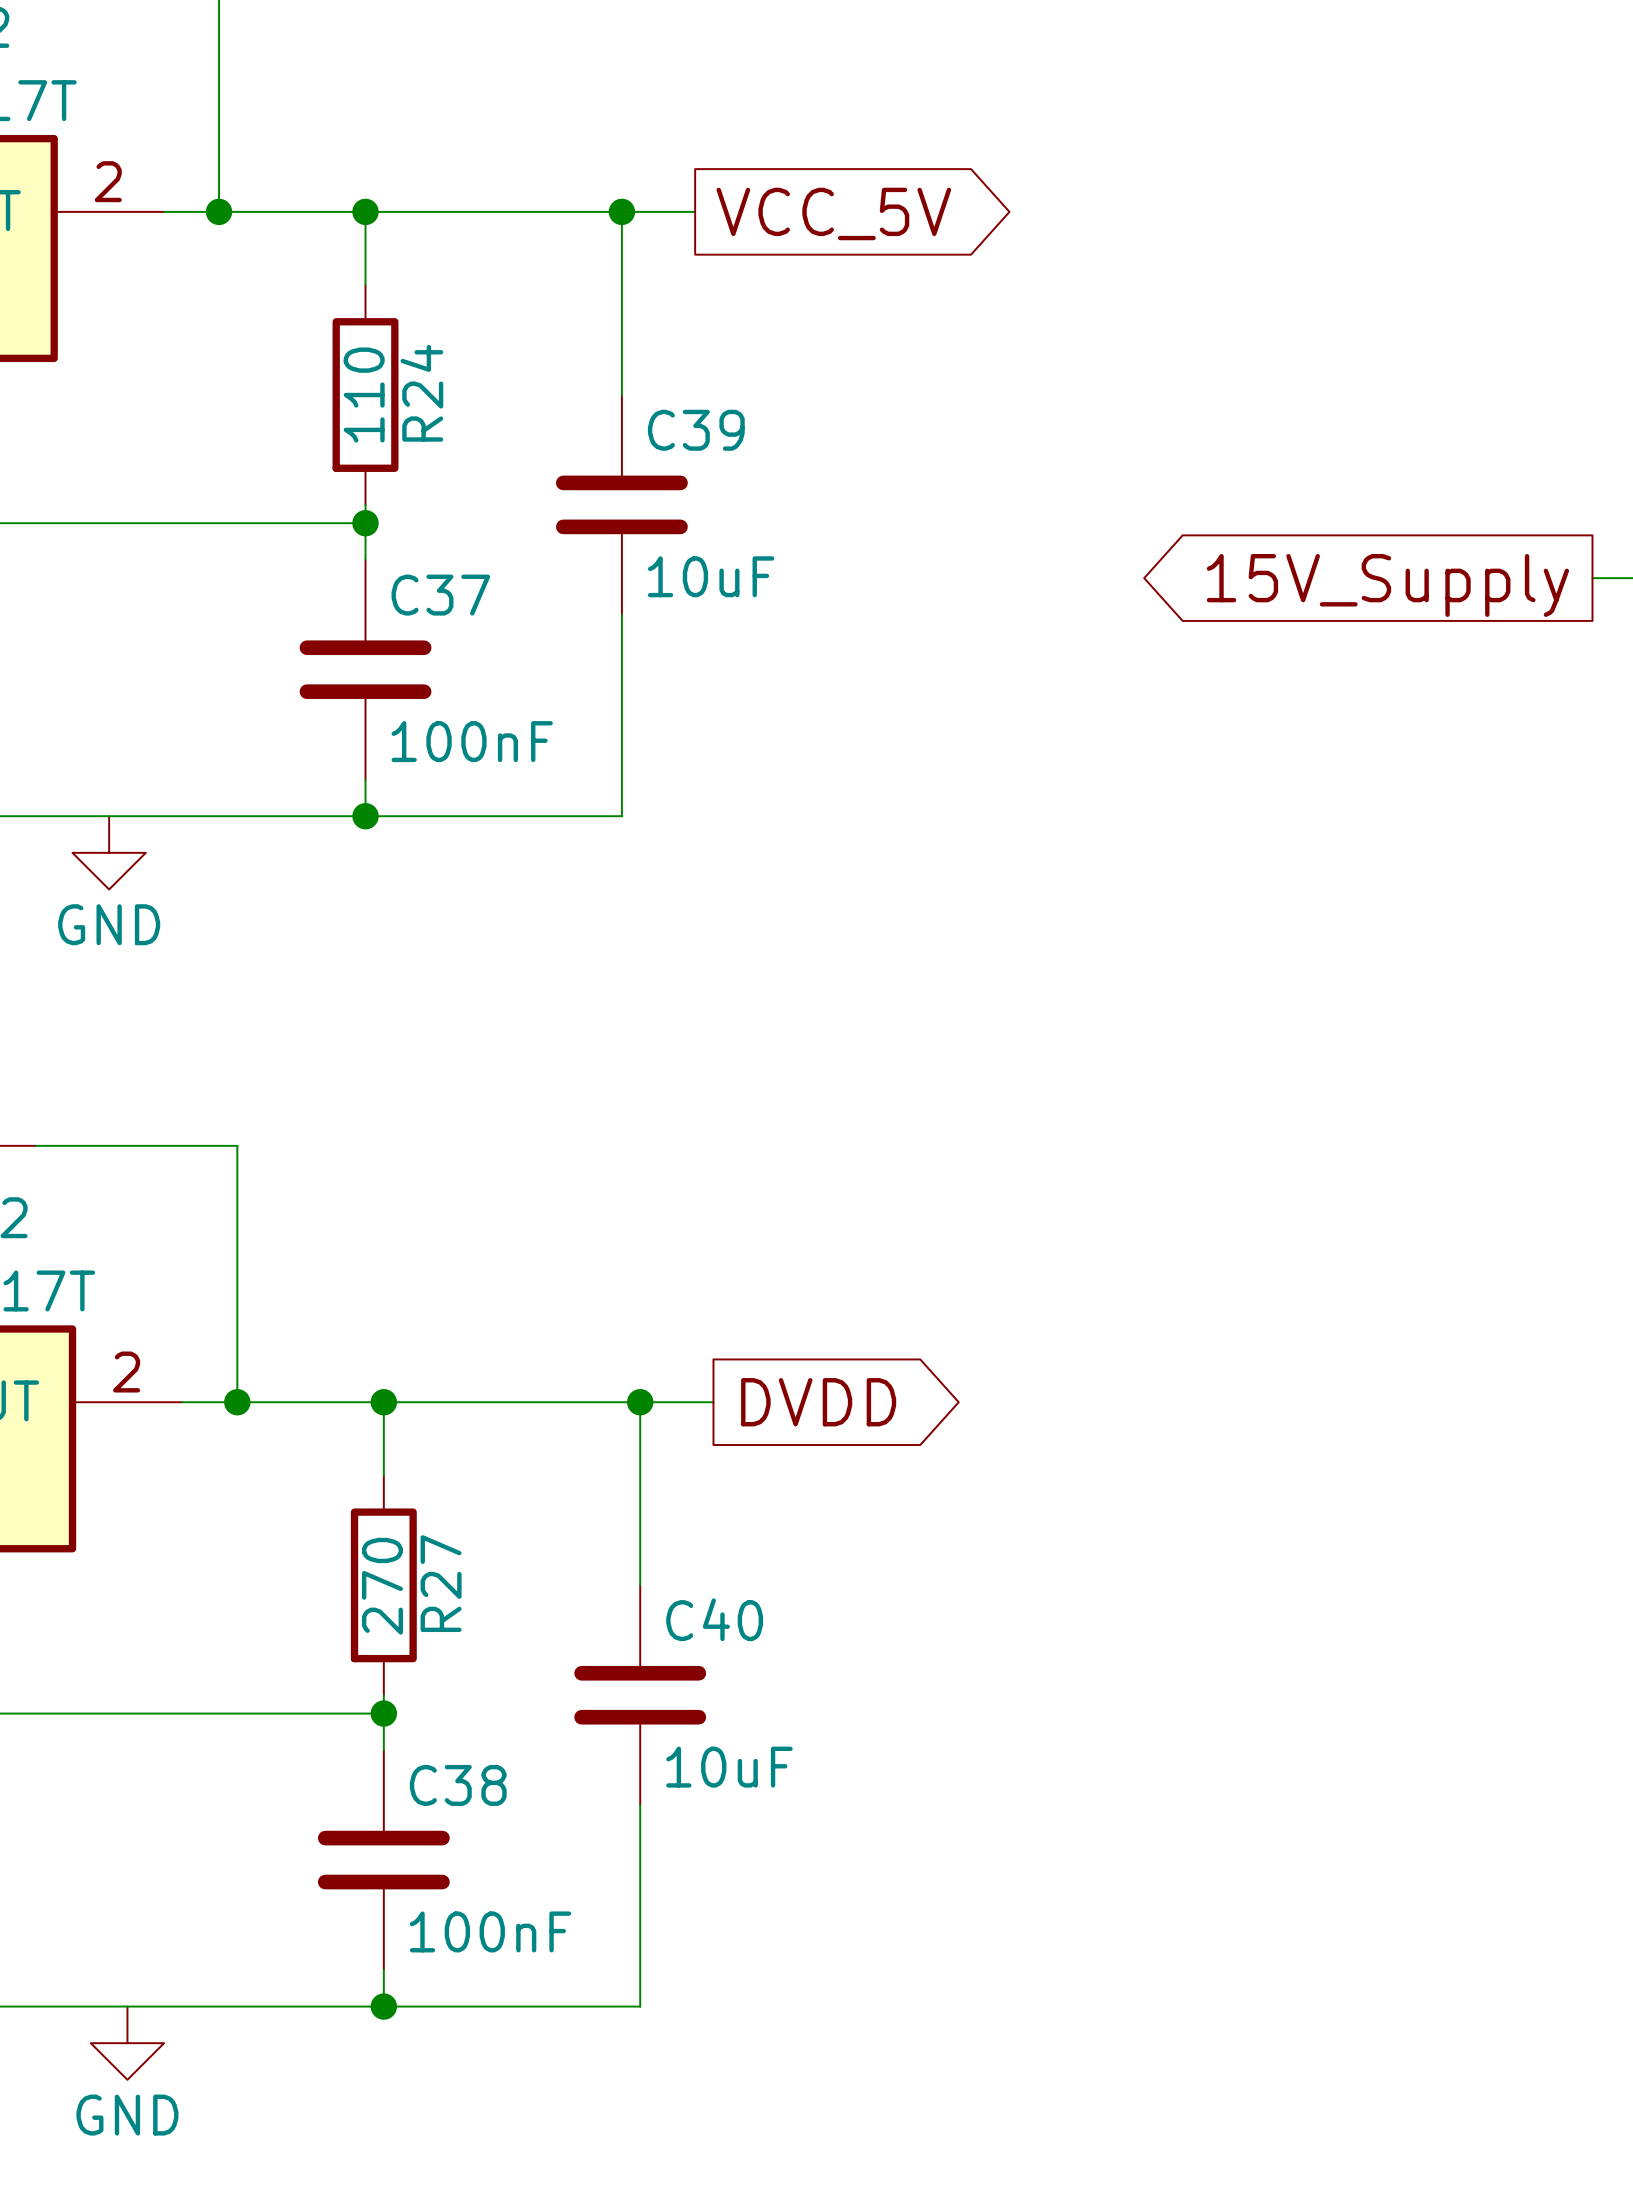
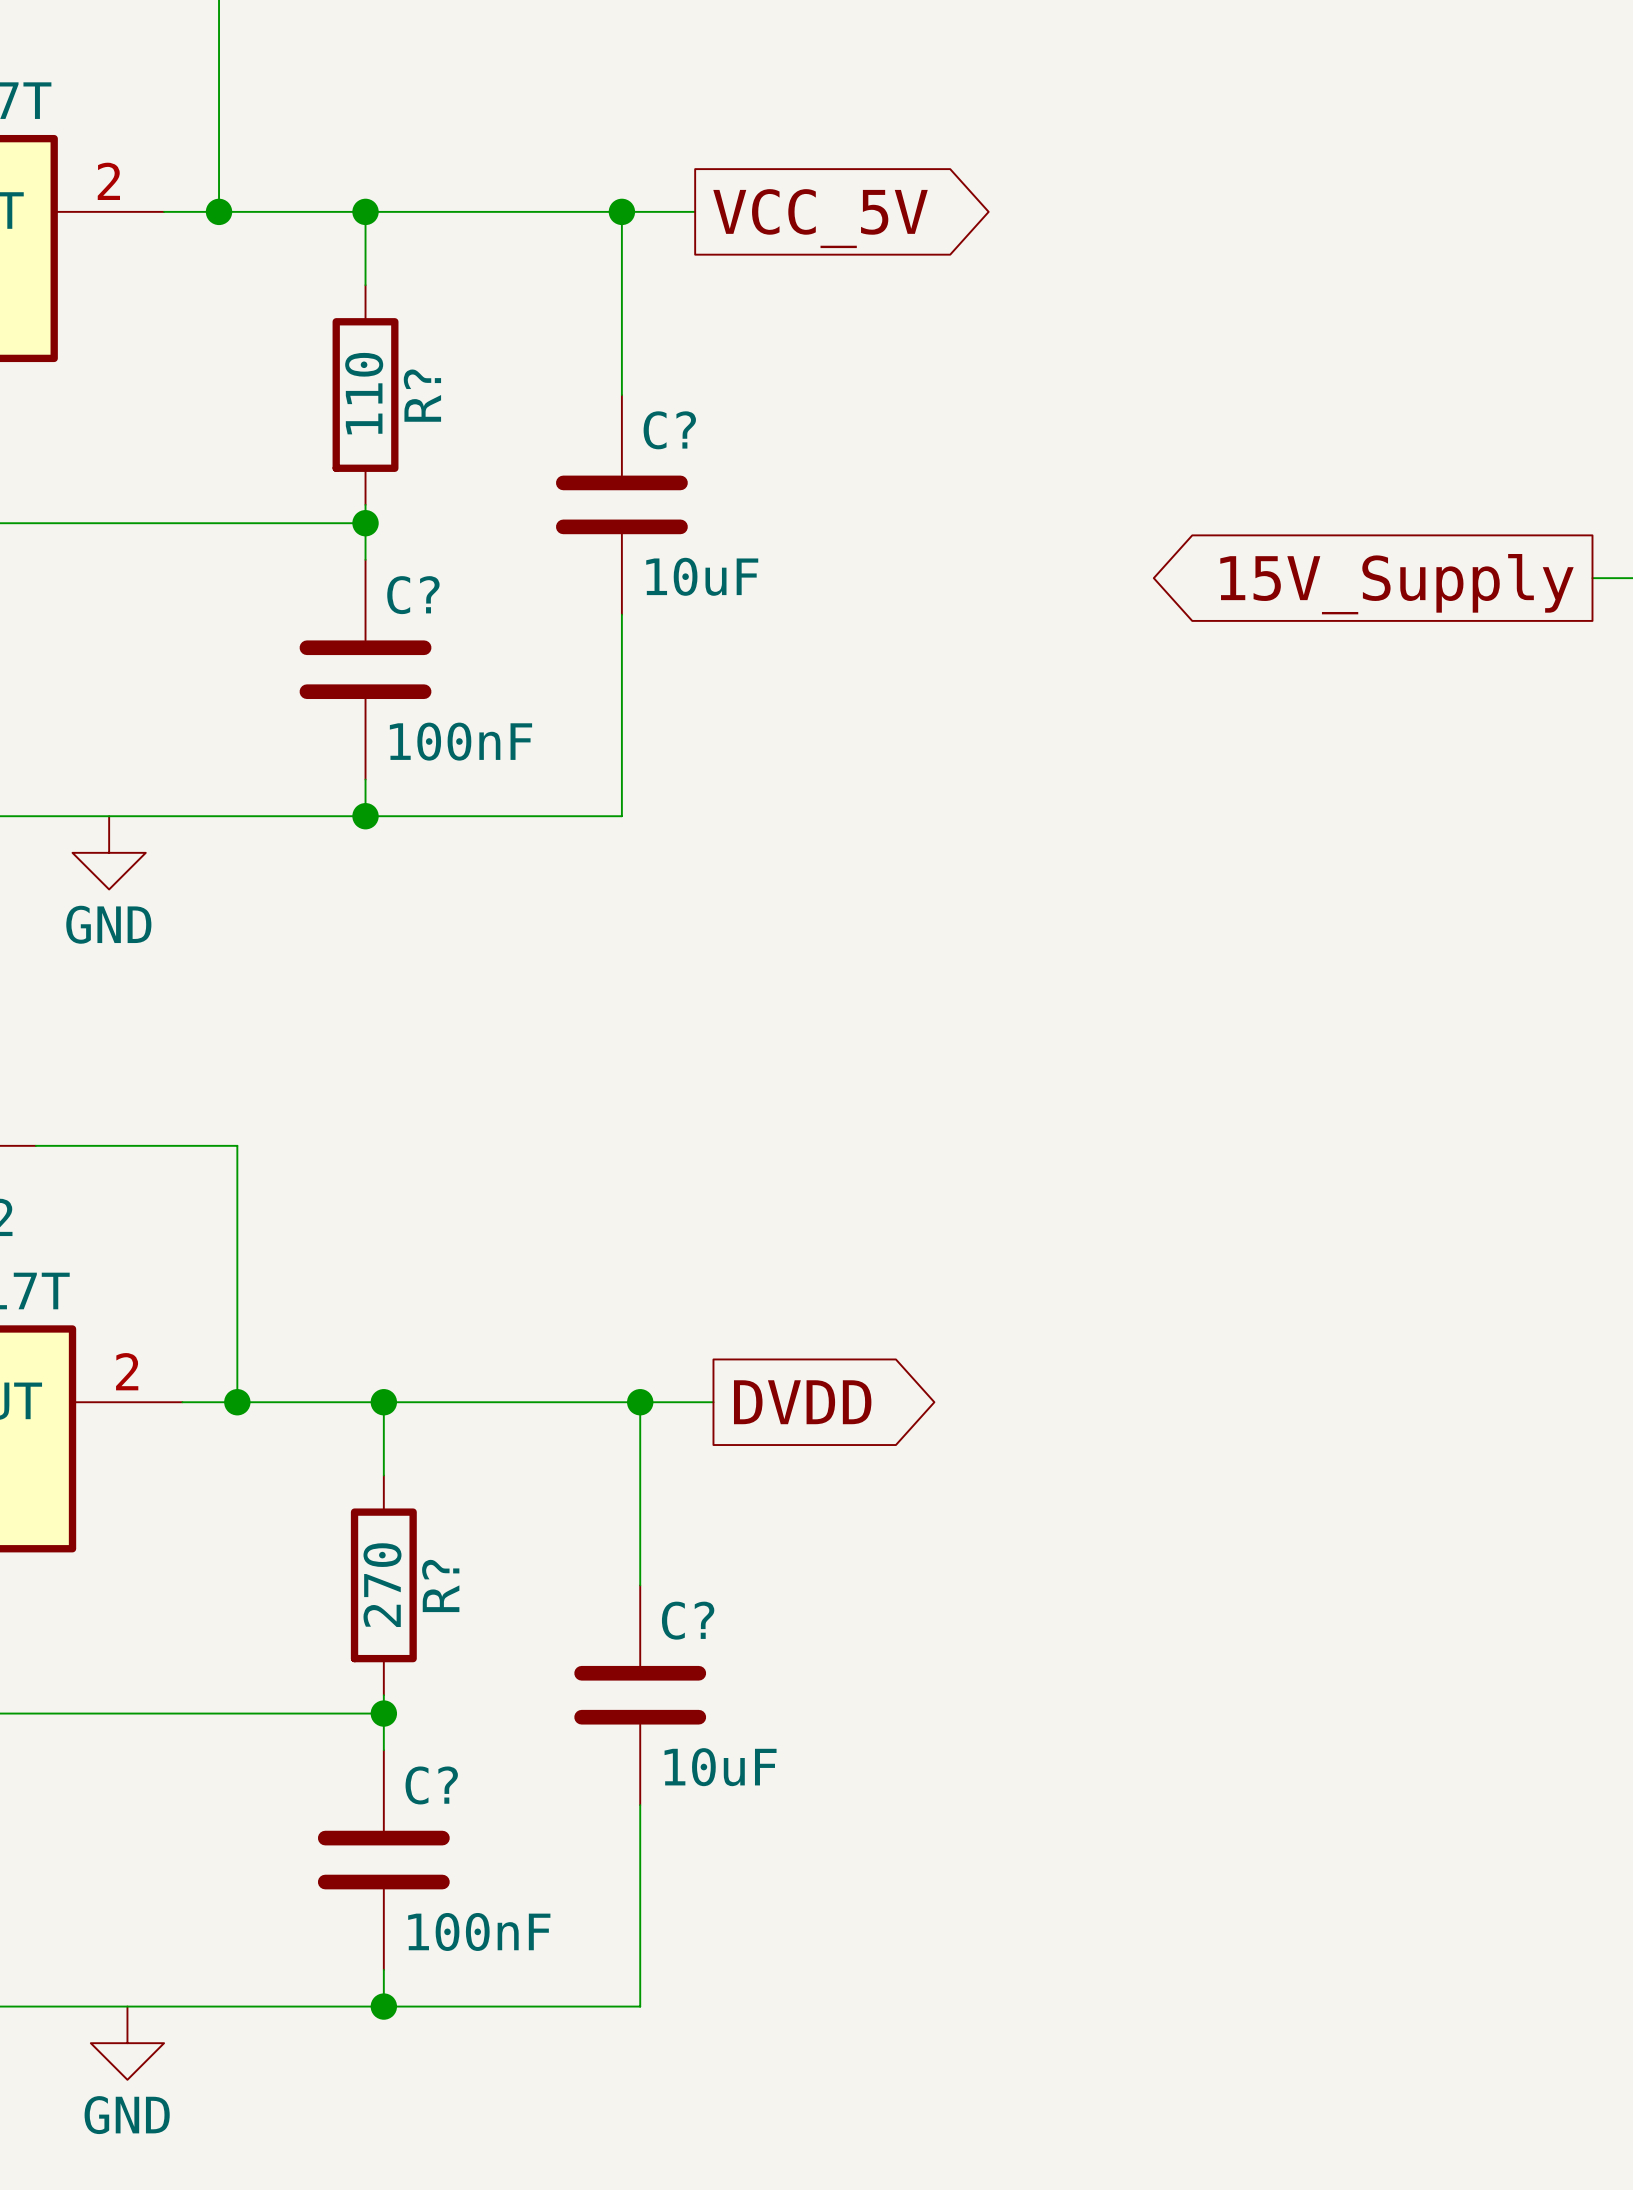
R24 name: R24 (421, 393) -> R? (422, 395)
C39 name: C39 (696, 430) -> C? (669, 430)
C37 name: C37 (440, 595) -> C? (413, 595)
R27 name: R27 (441, 1583) -> R? (440, 1585)
C40 name: C40 (714, 1619) -> C? (688, 1620)
C38 name: C38 (458, 1785) -> C? (431, 1785)

